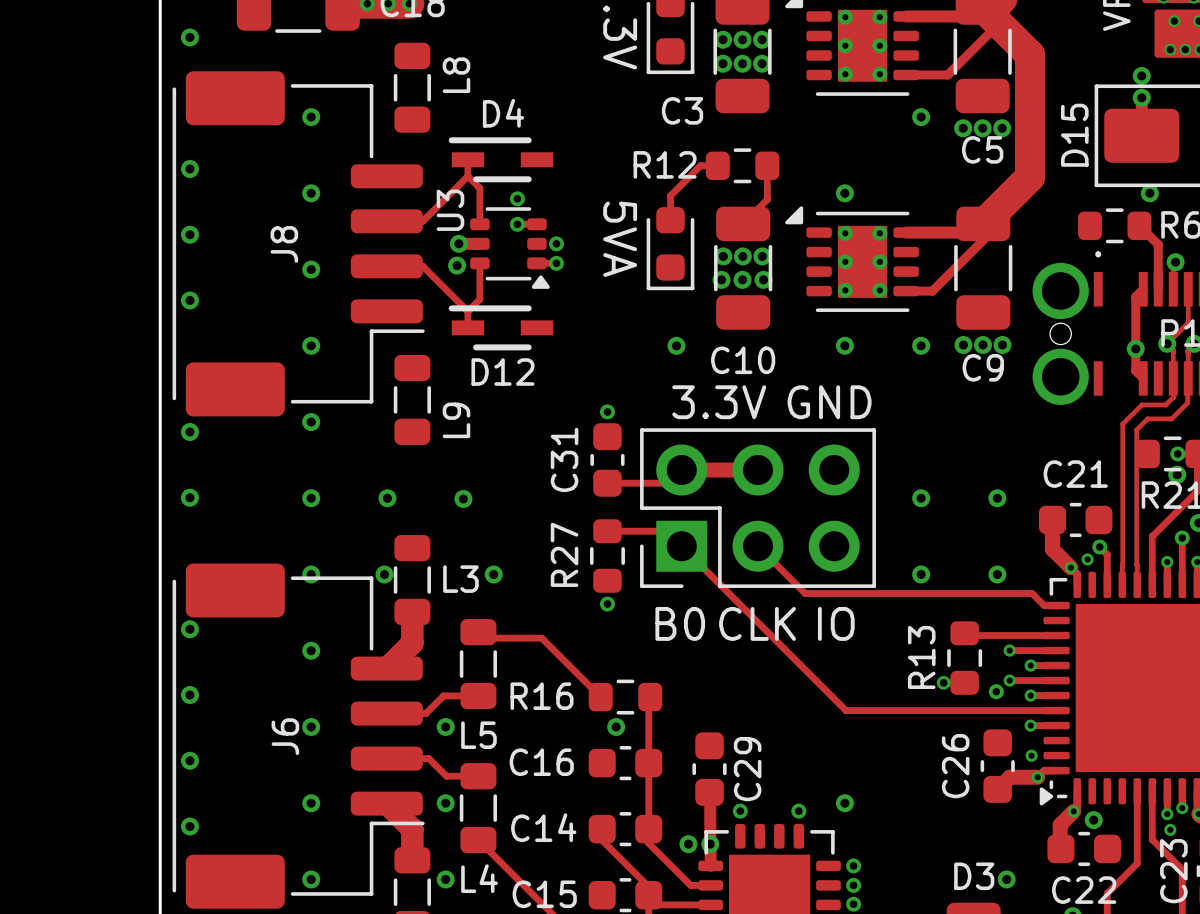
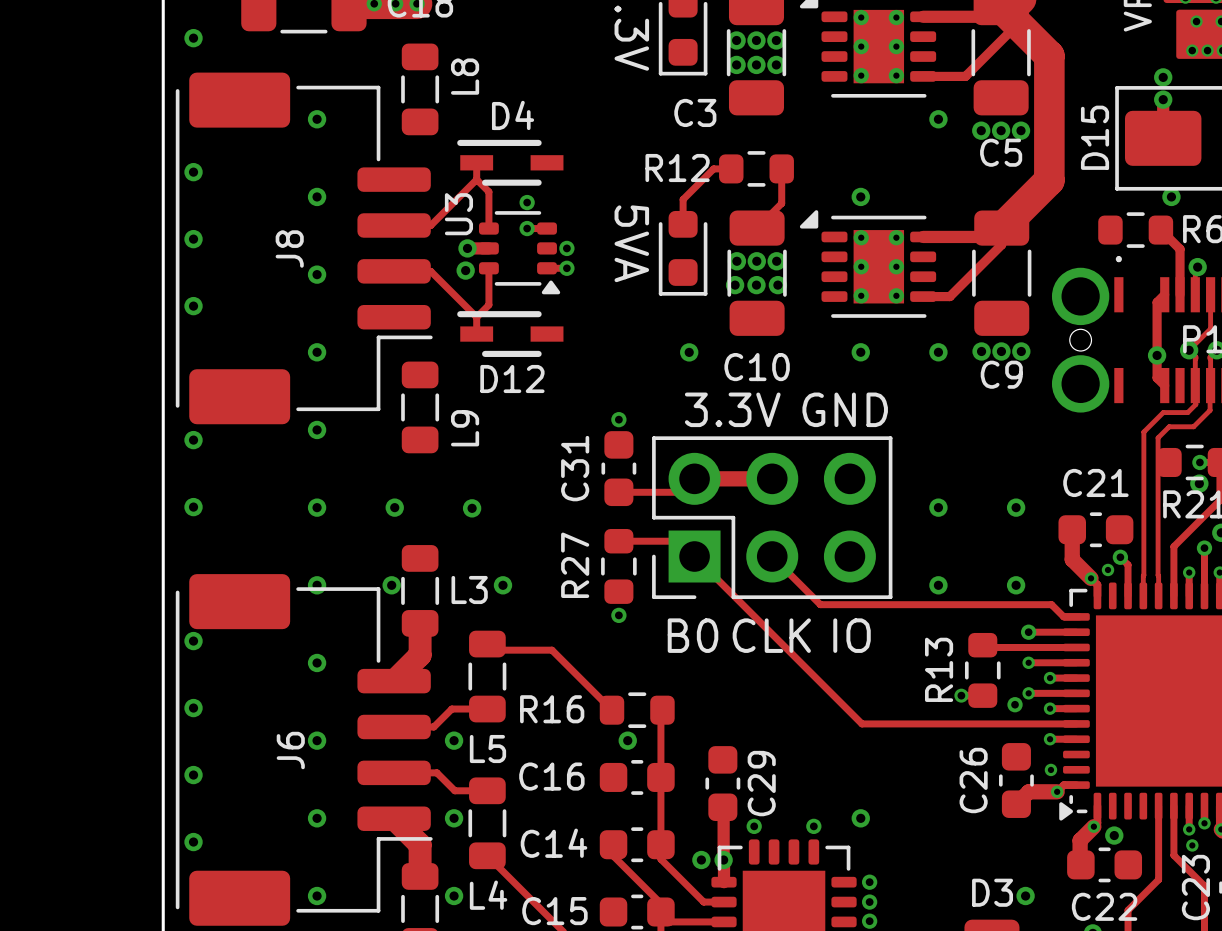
track: none -> (1028, 632) (1076, 632)
via: none -> (1028, 632)

